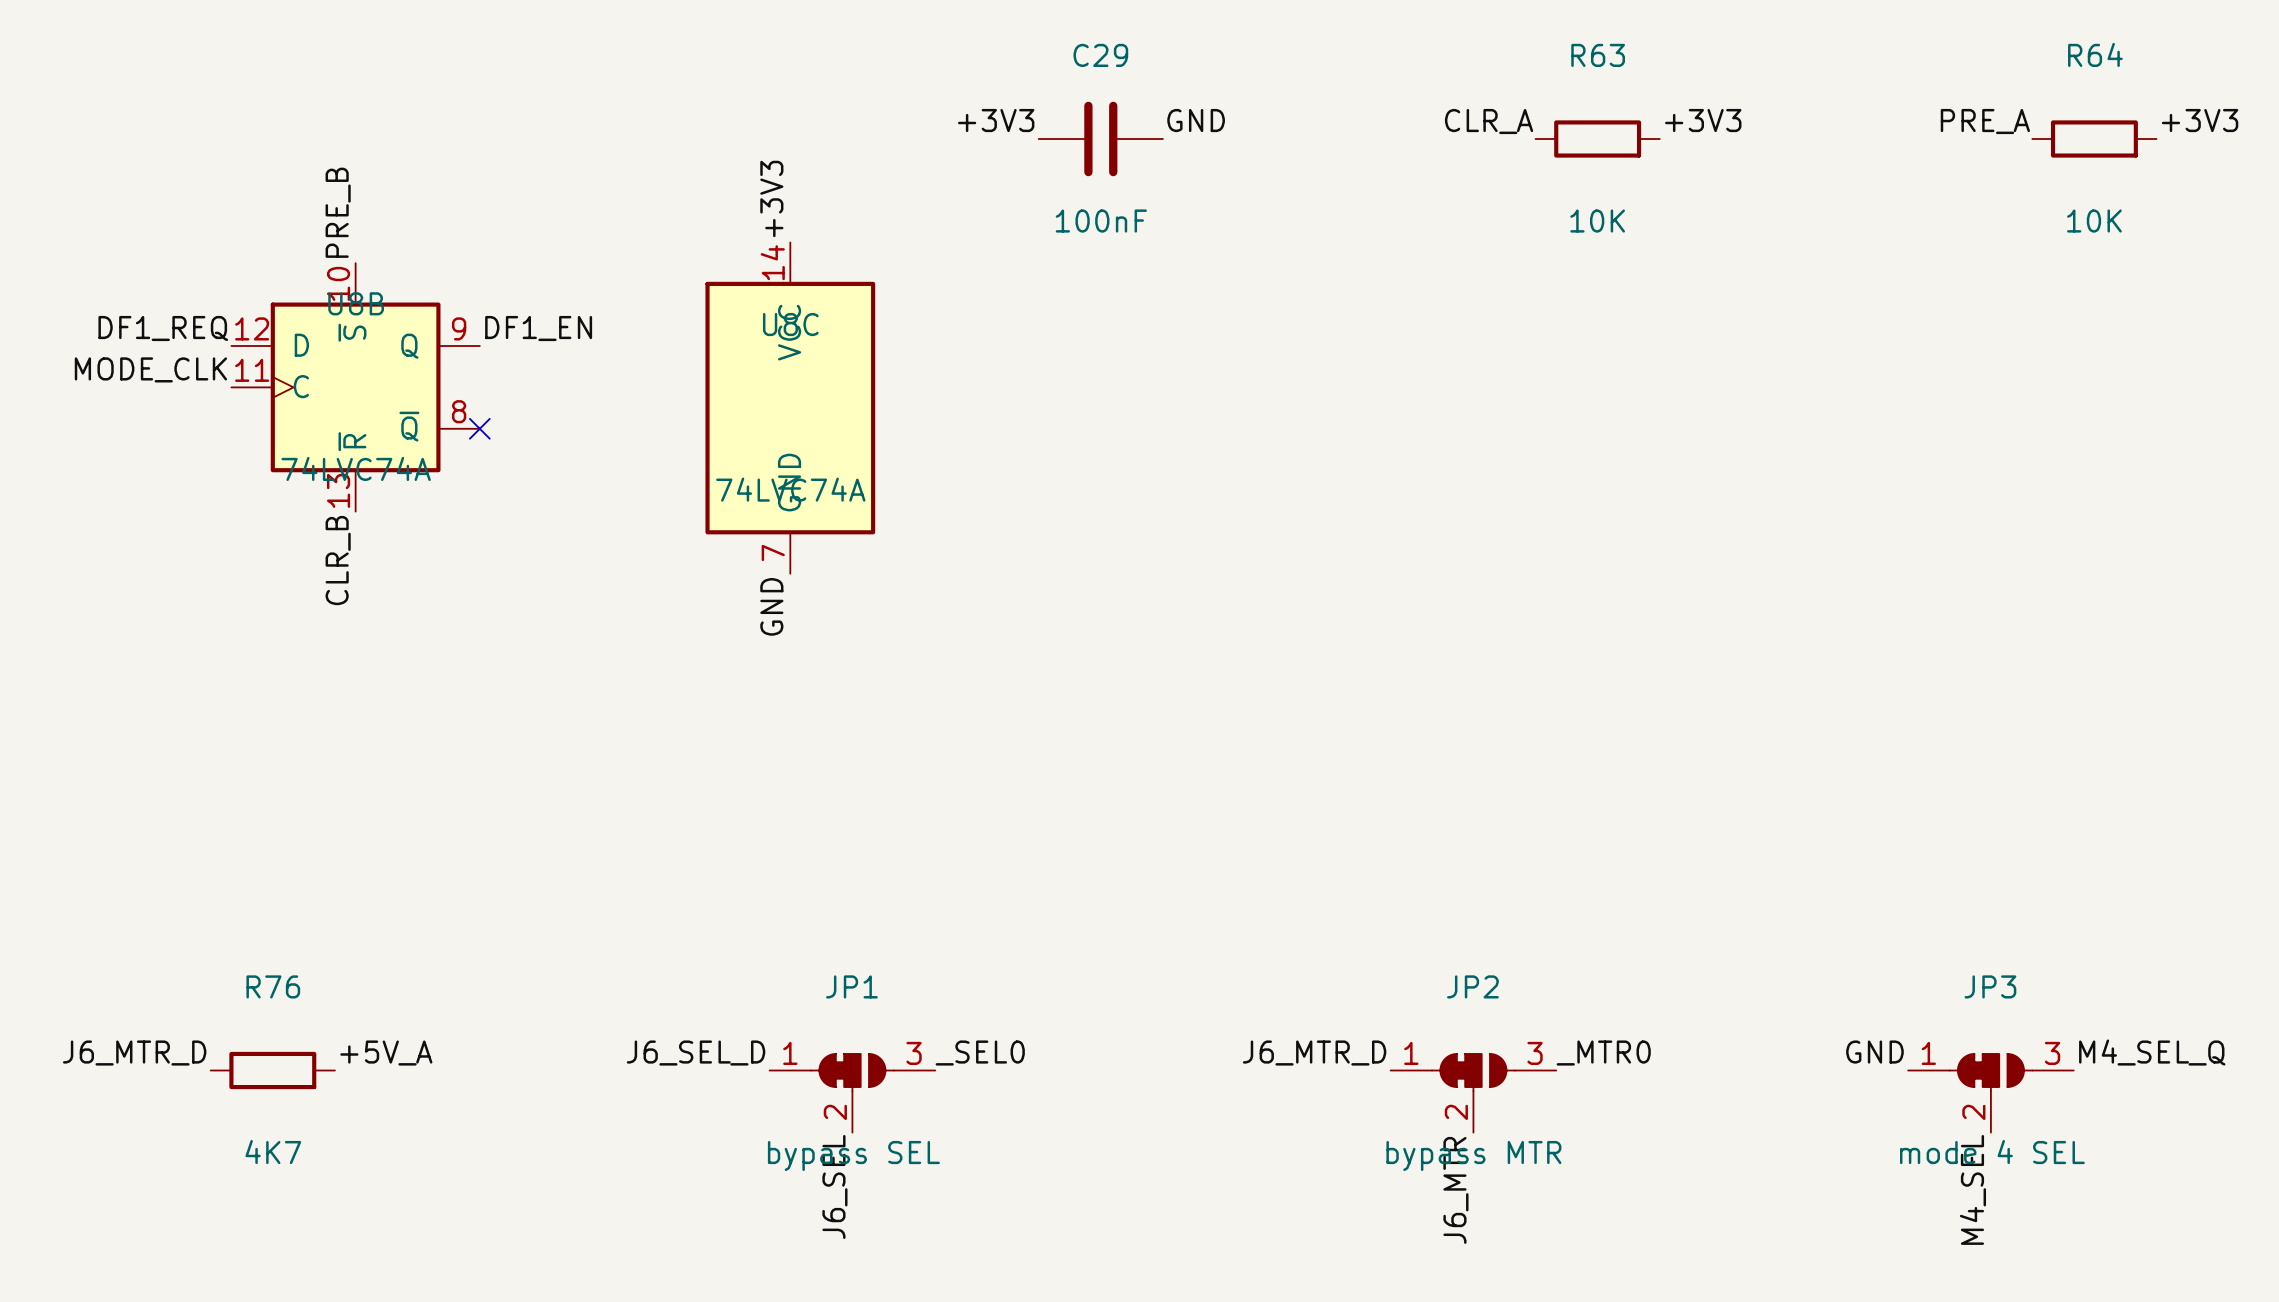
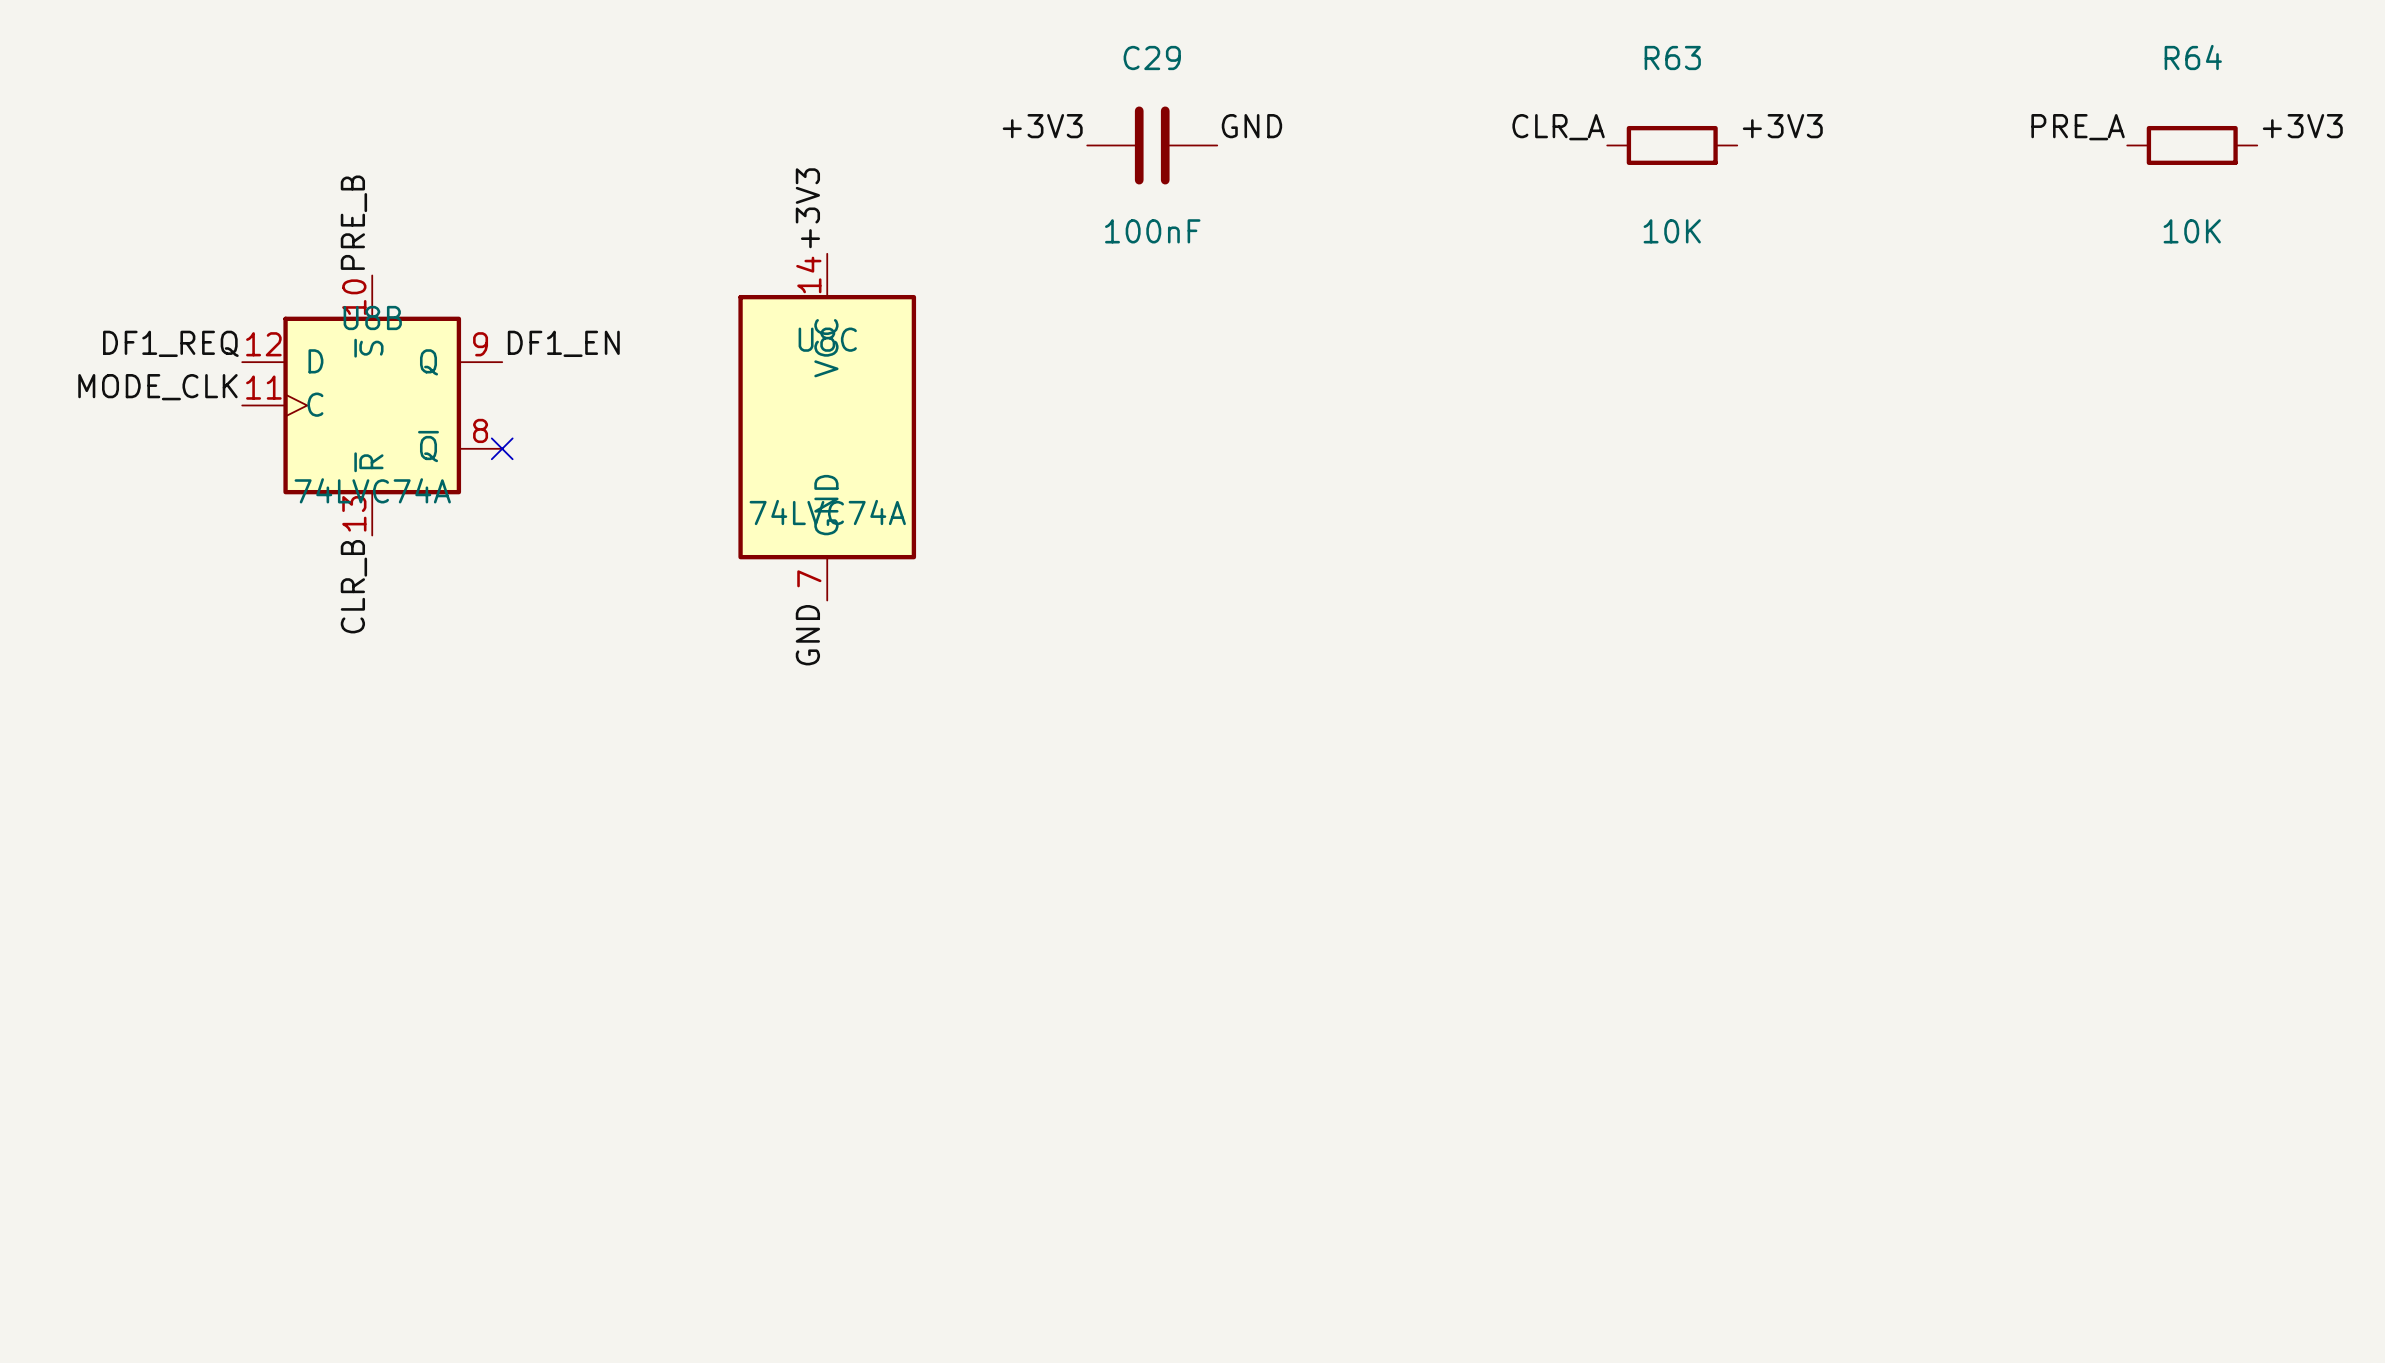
label: GND (1874, 1052) -> none
label: M4_SEL_Q (2152, 1052) -> none
label: J6_MTR_D (134, 1053) -> none
label: +5V_A (386, 1053) -> none
label: J6_SEL_D (696, 1053) -> none
label: _SEL0 (980, 1053) -> none
label: J6_MTR_D (1314, 1053) -> none
label: _MTR0 (1603, 1053) -> none
R76: 4K7 (272, 1070) -> none
JP1: bypass SEL (852, 1093) -> none
JP2: bypass MTR (1473, 1093) -> none
JP3: mode 4 SEL (1990, 1093) -> none
label: J6_SEL (834, 1186) -> none
label: M4_SEL (1972, 1189) -> none
label: J6_MTR (1455, 1190) -> none

